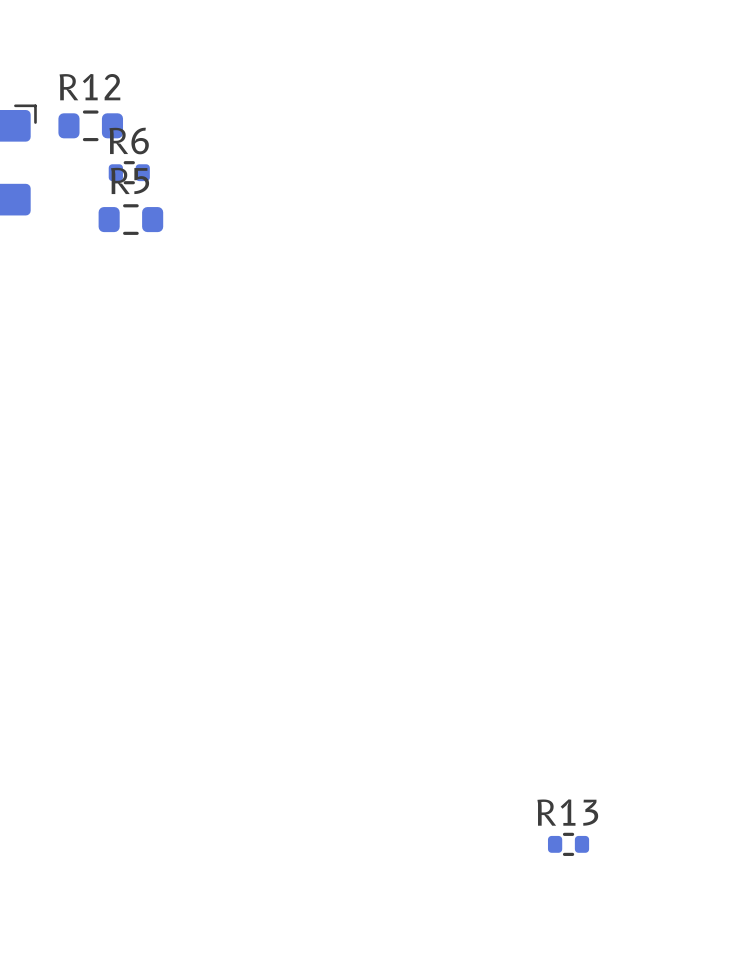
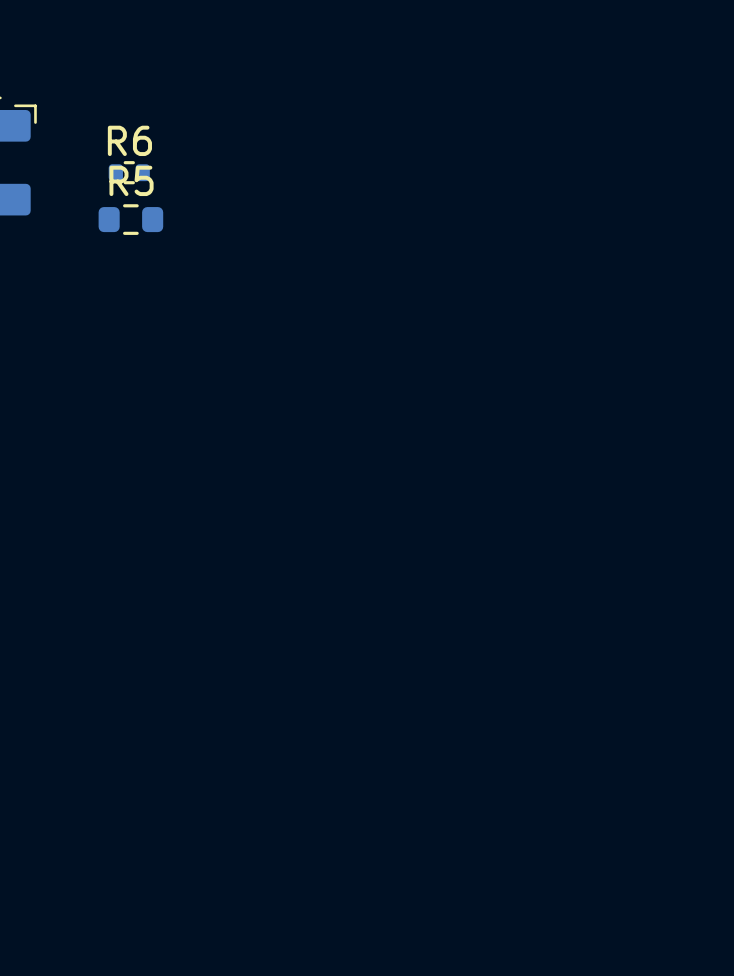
R12: (90, 125) -> none
R13: (568, 844) -> none

